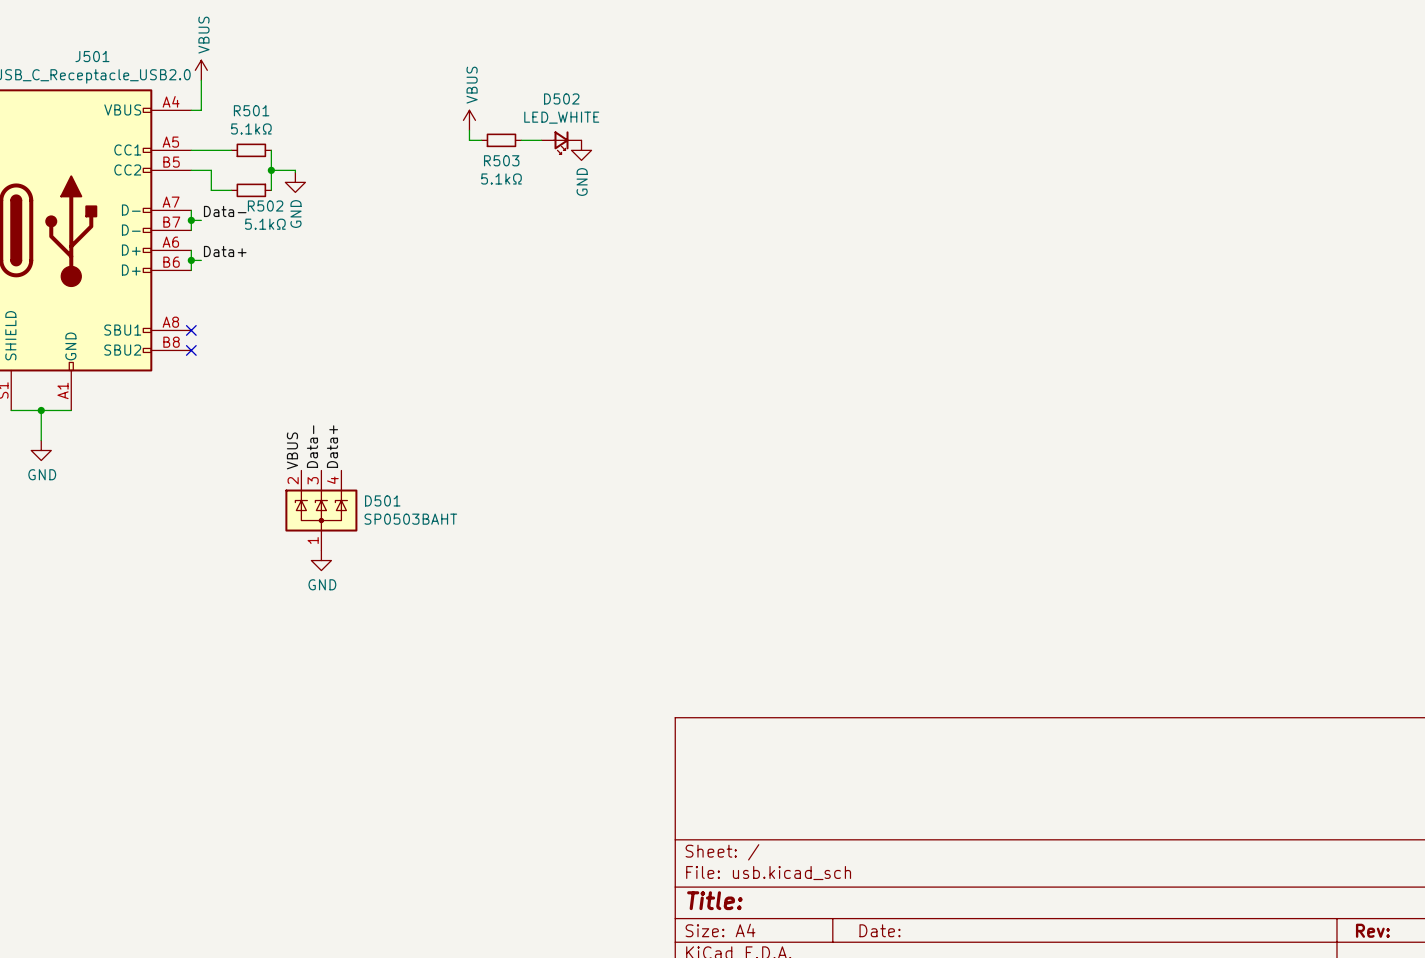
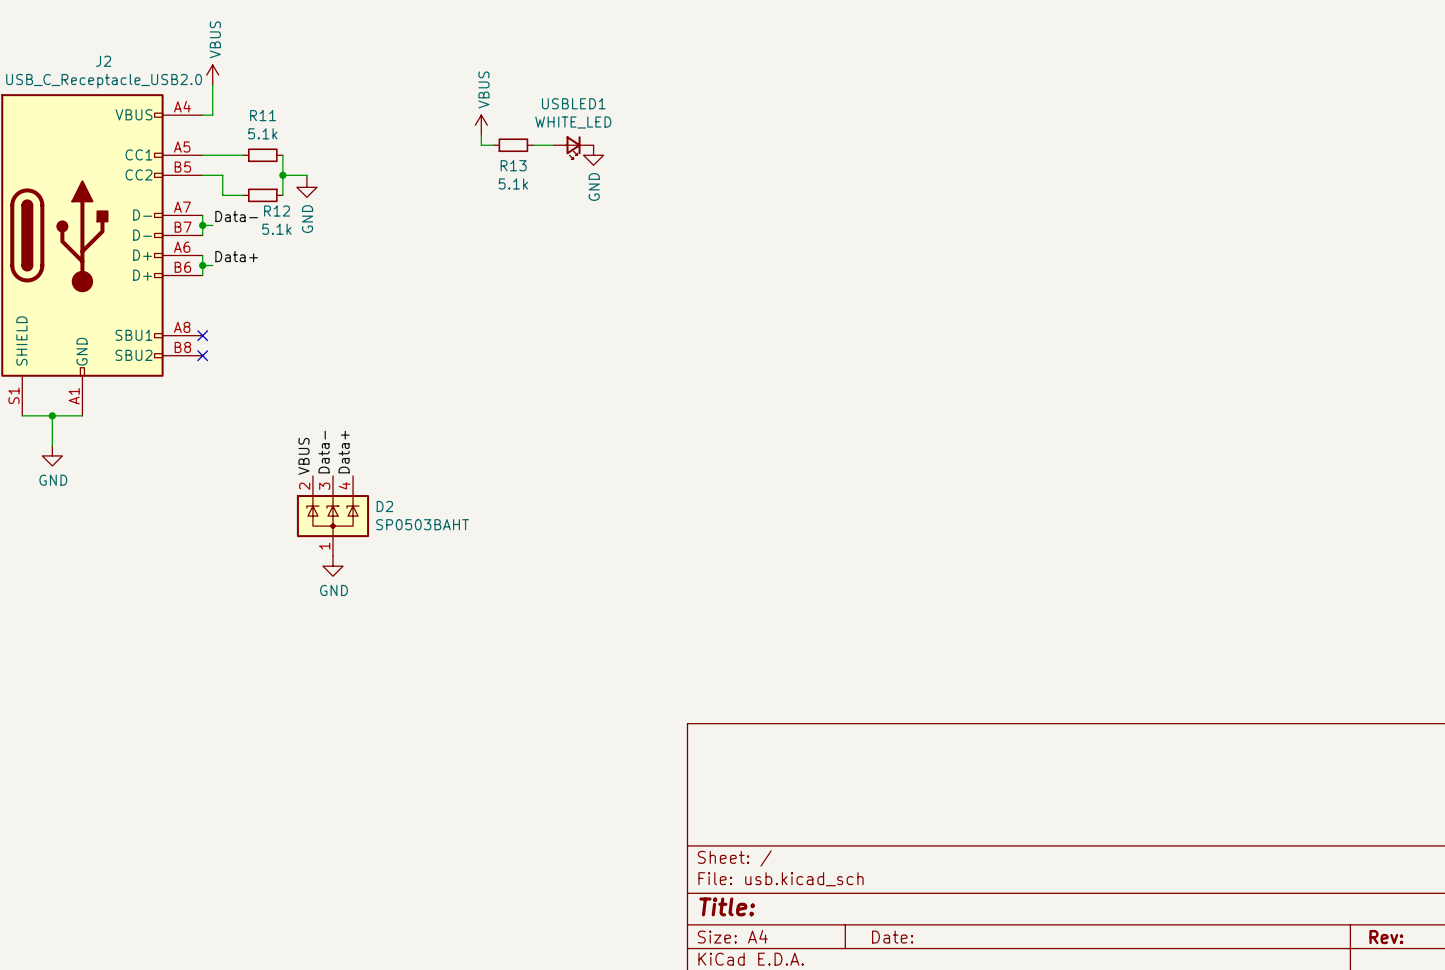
J501 name: J501 (92, 56) -> J2 (103, 61)
D502 name: D502 (561, 98) -> USBLED1 (573, 103)
R501 name: R501 (251, 110) -> R11 (263, 115)
D502 value: LED_WHITE (561, 117) -> WHITE_LED (573, 122)
R501 value: 5.1kΩ (251, 128) -> 5.1k (262, 133)
R503 name: R503 (501, 160) -> R13 (513, 165)
R503 value: 5.1kΩ (501, 179) -> 5.1k (513, 183)
R502 name: R502 (265, 206) -> R12 (277, 211)
R502 value: 5.1kΩ (265, 224) -> 5.1k (276, 229)
D501 name: D501 (382, 500) -> D2 (384, 506)

